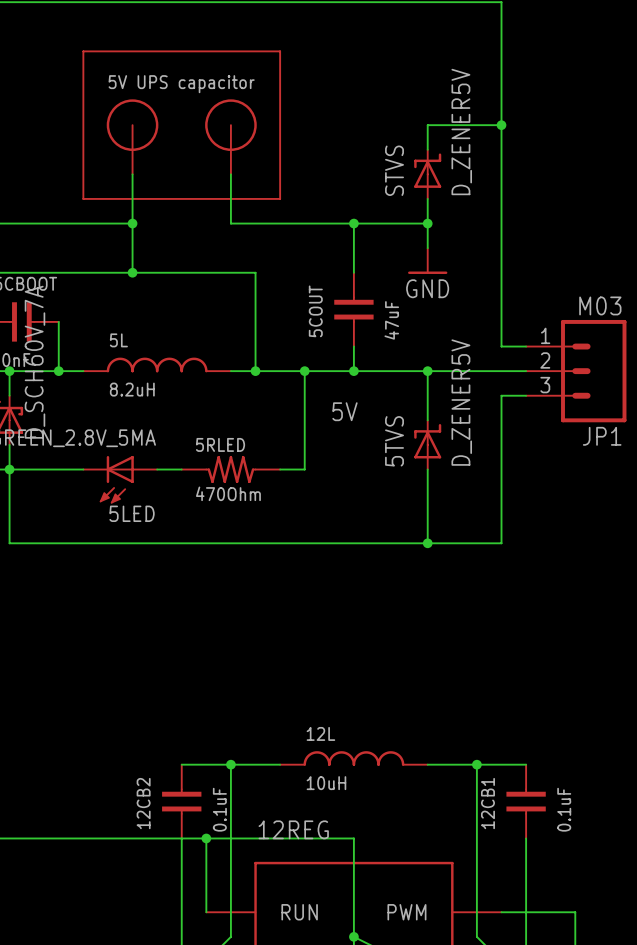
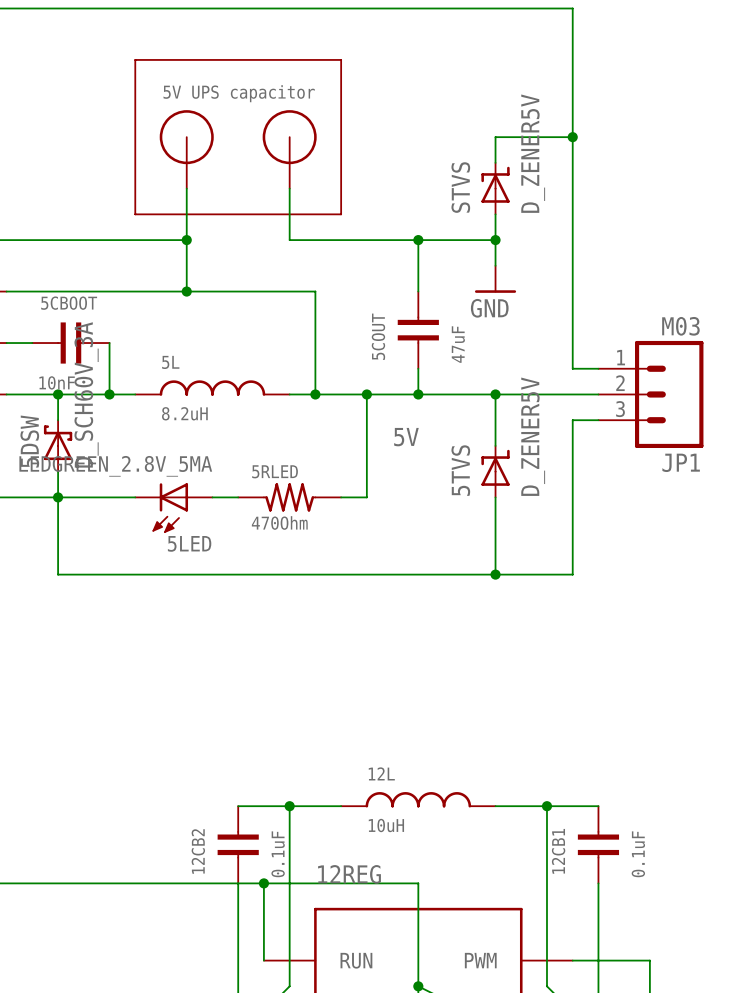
5DSW value: D_SCH60V_7A (34, 362) -> D_SCH60V_3A (86, 394)

